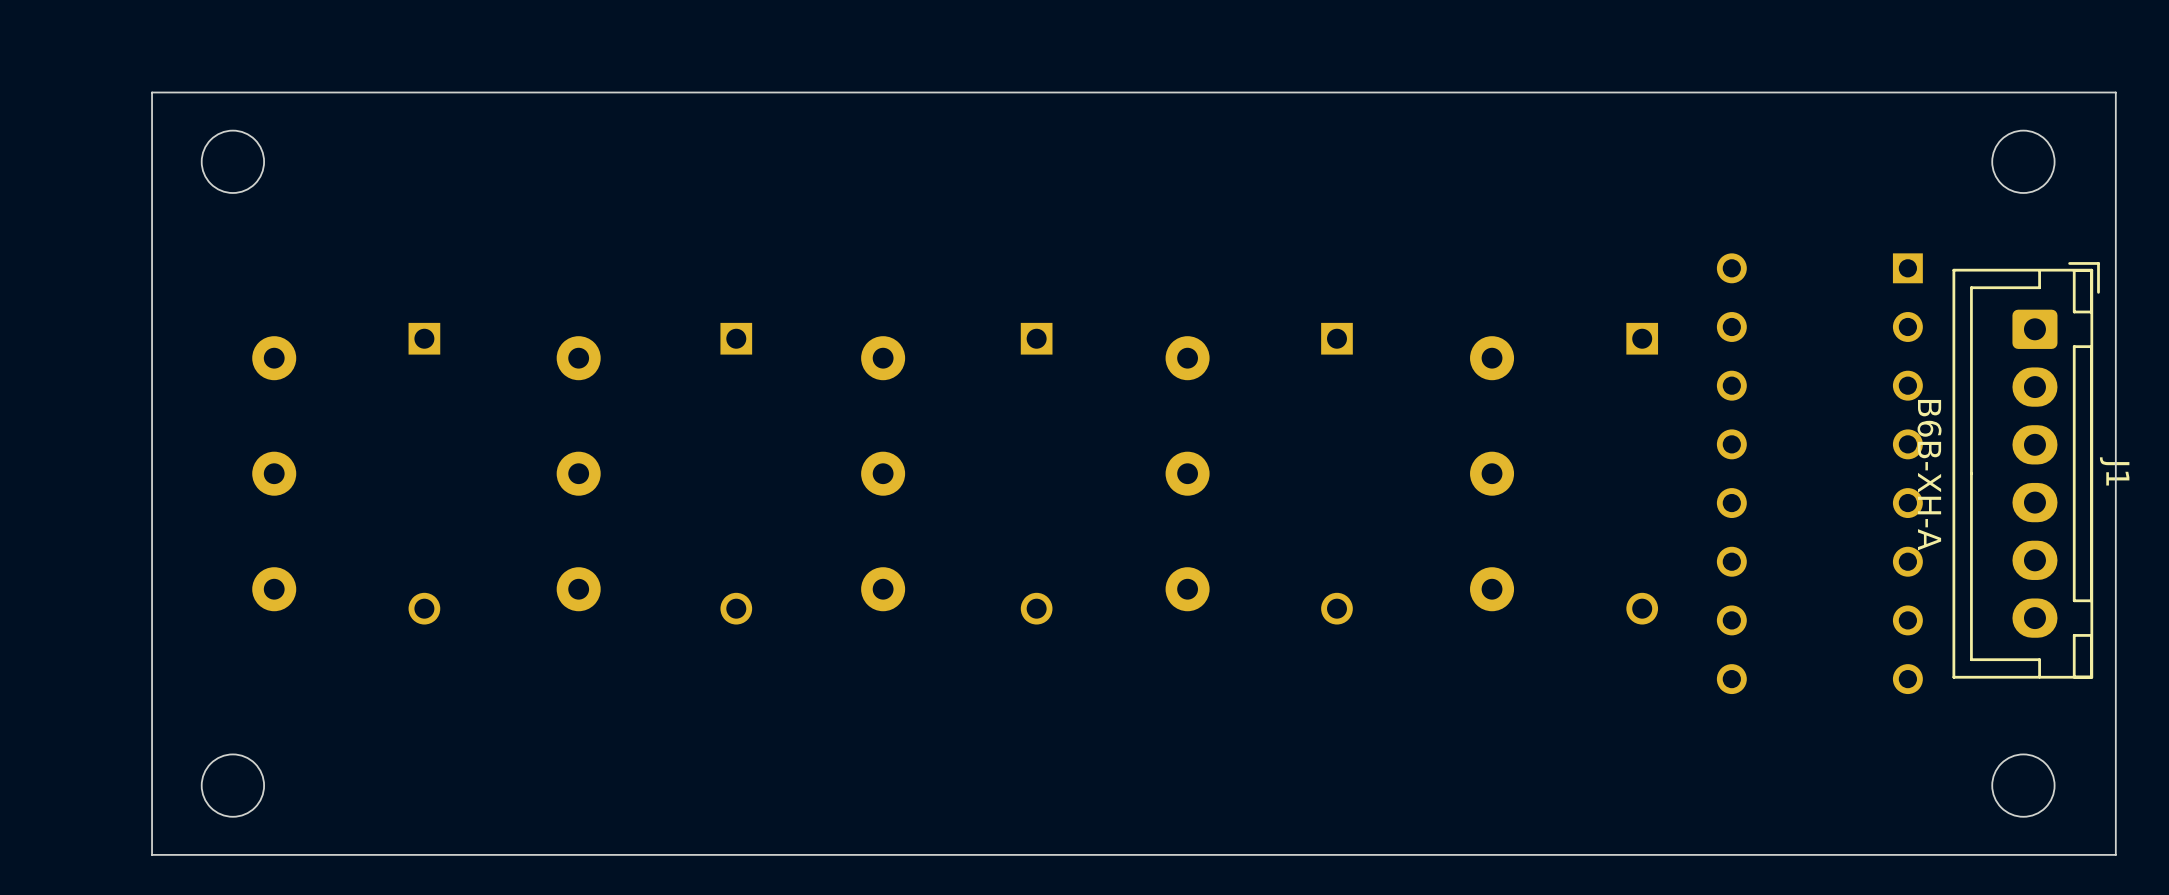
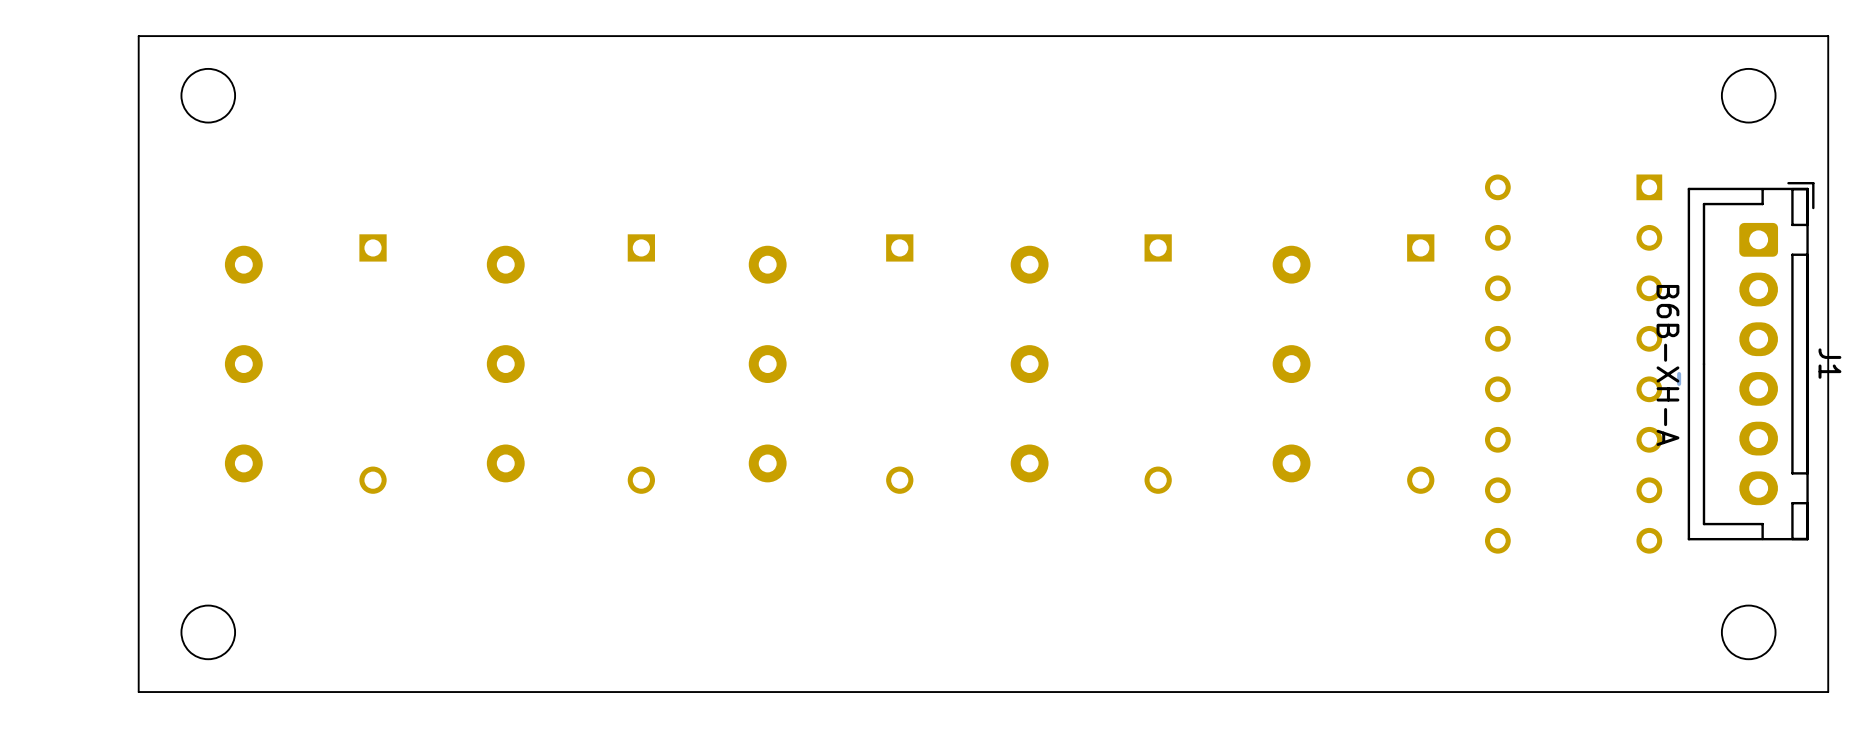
track: none -> (1679, 374) (1679, 383)

